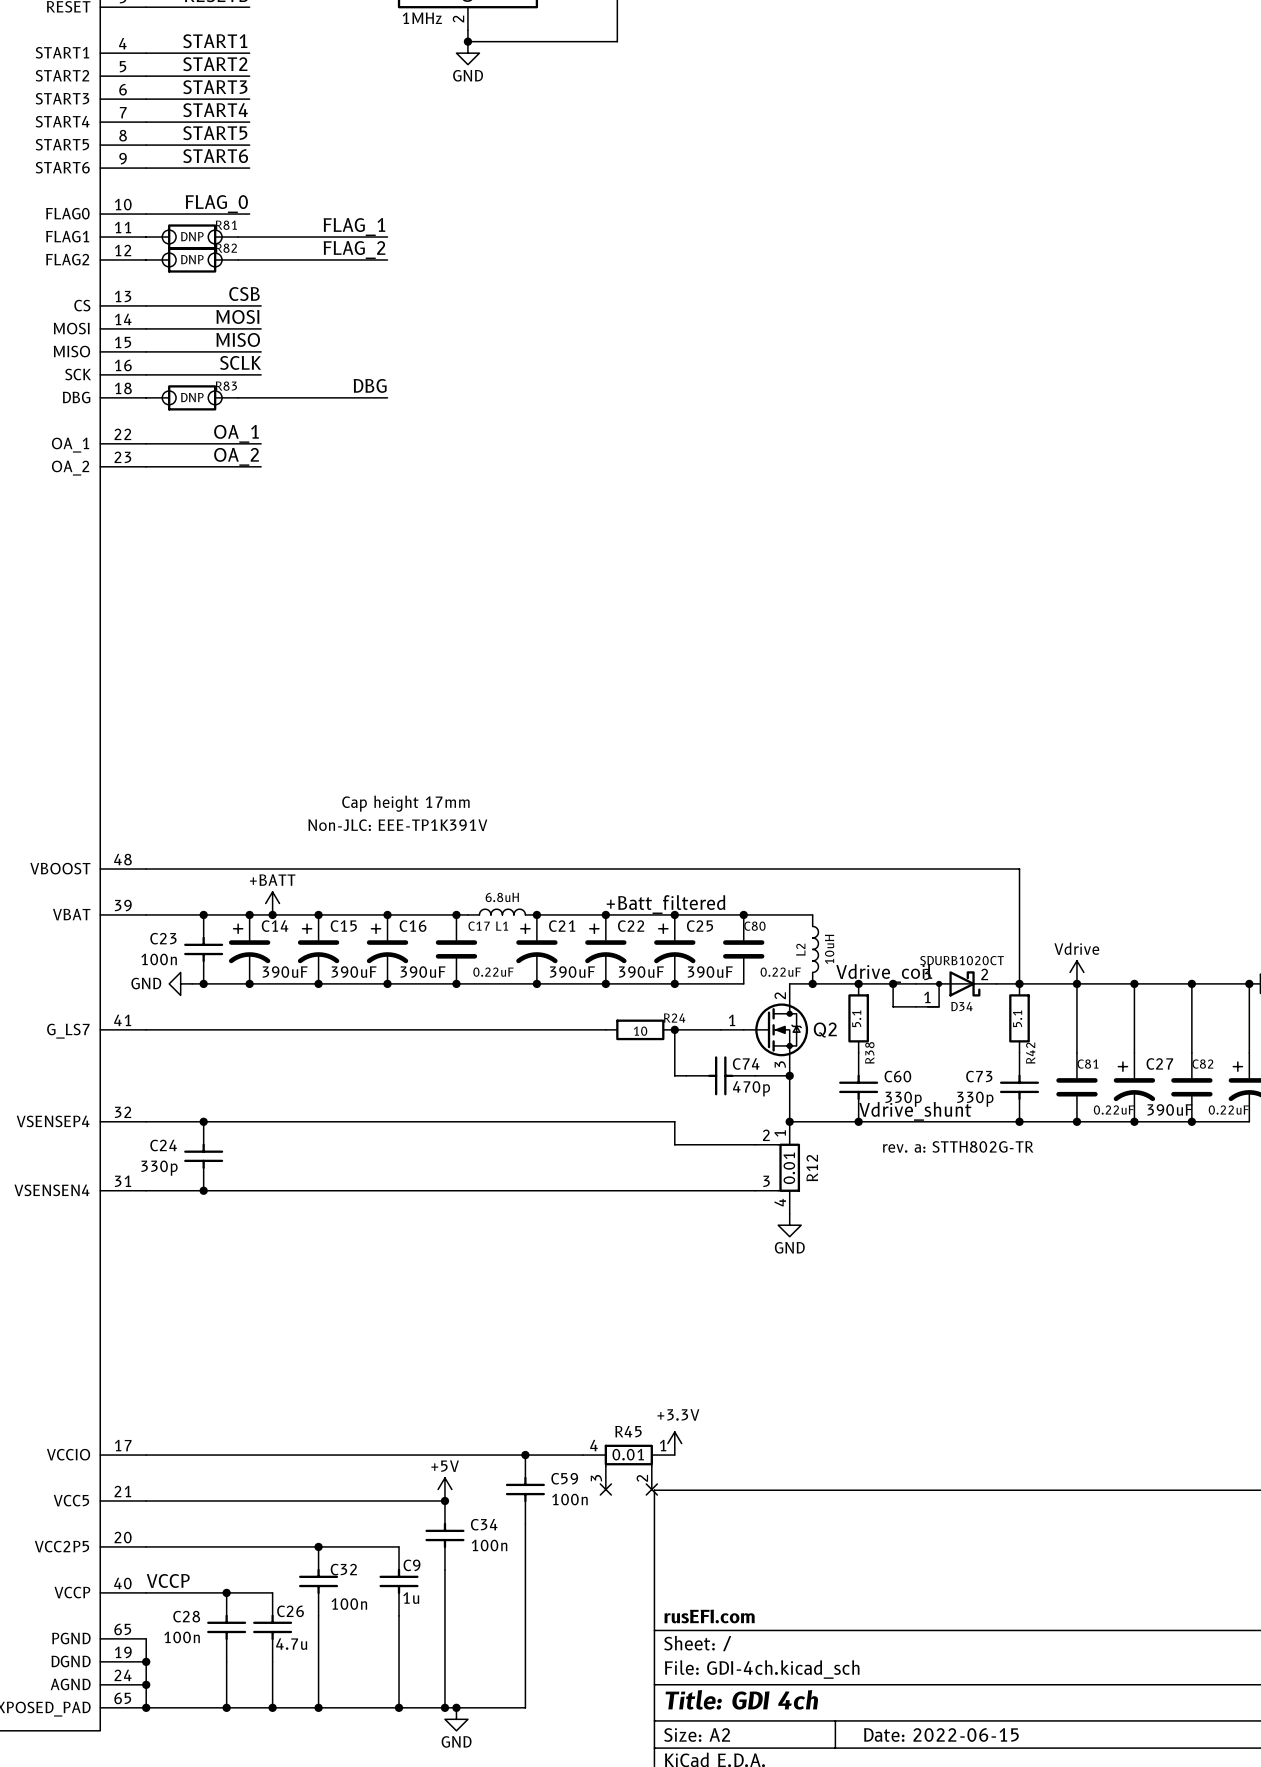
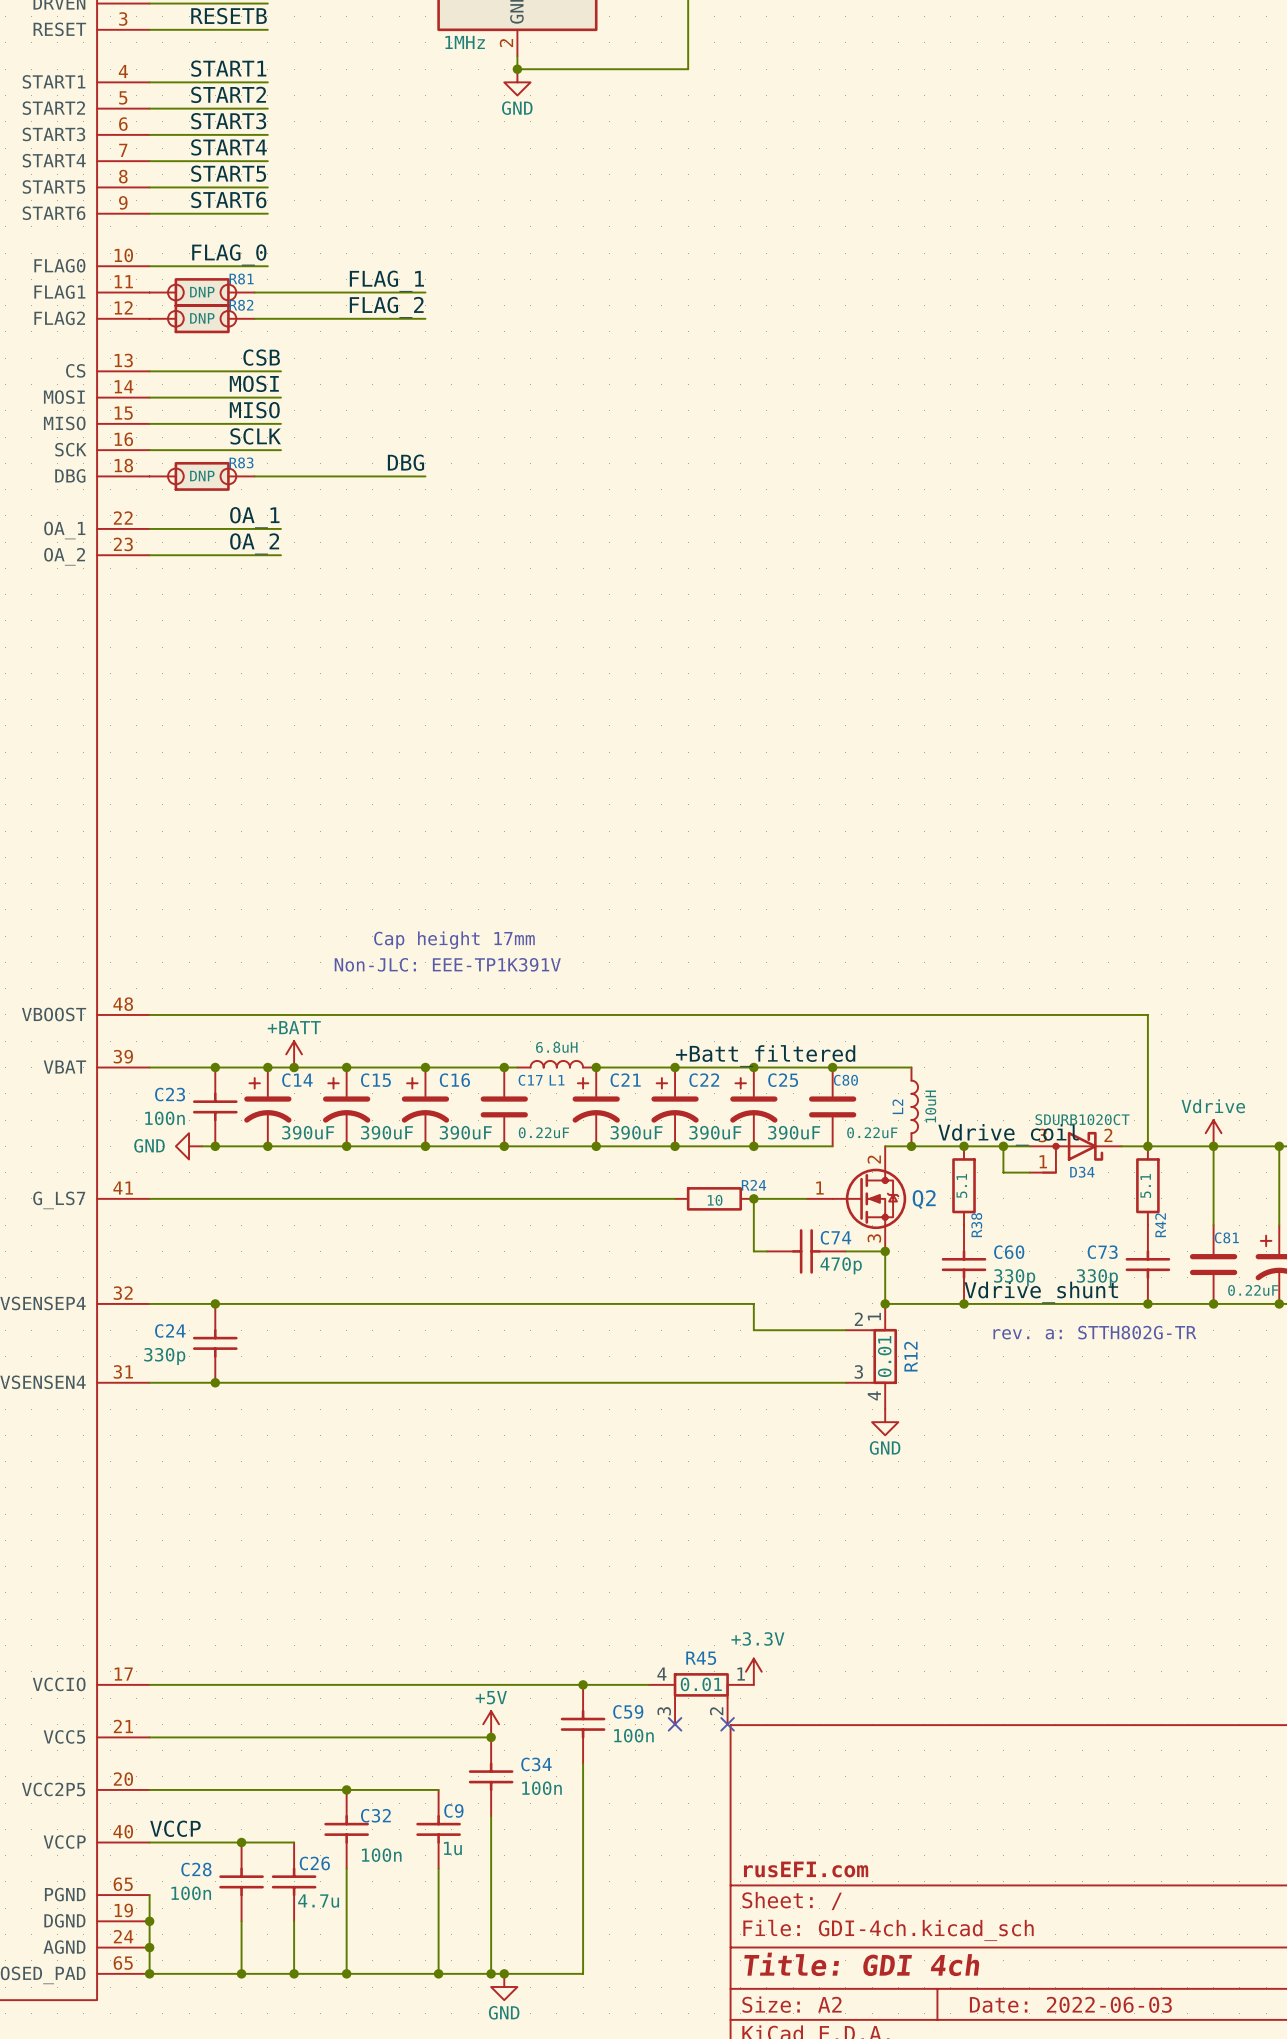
title block: Date: 2022-06-15 (941, 1734) -> Date: 2022-06-03 (1070, 2004)

